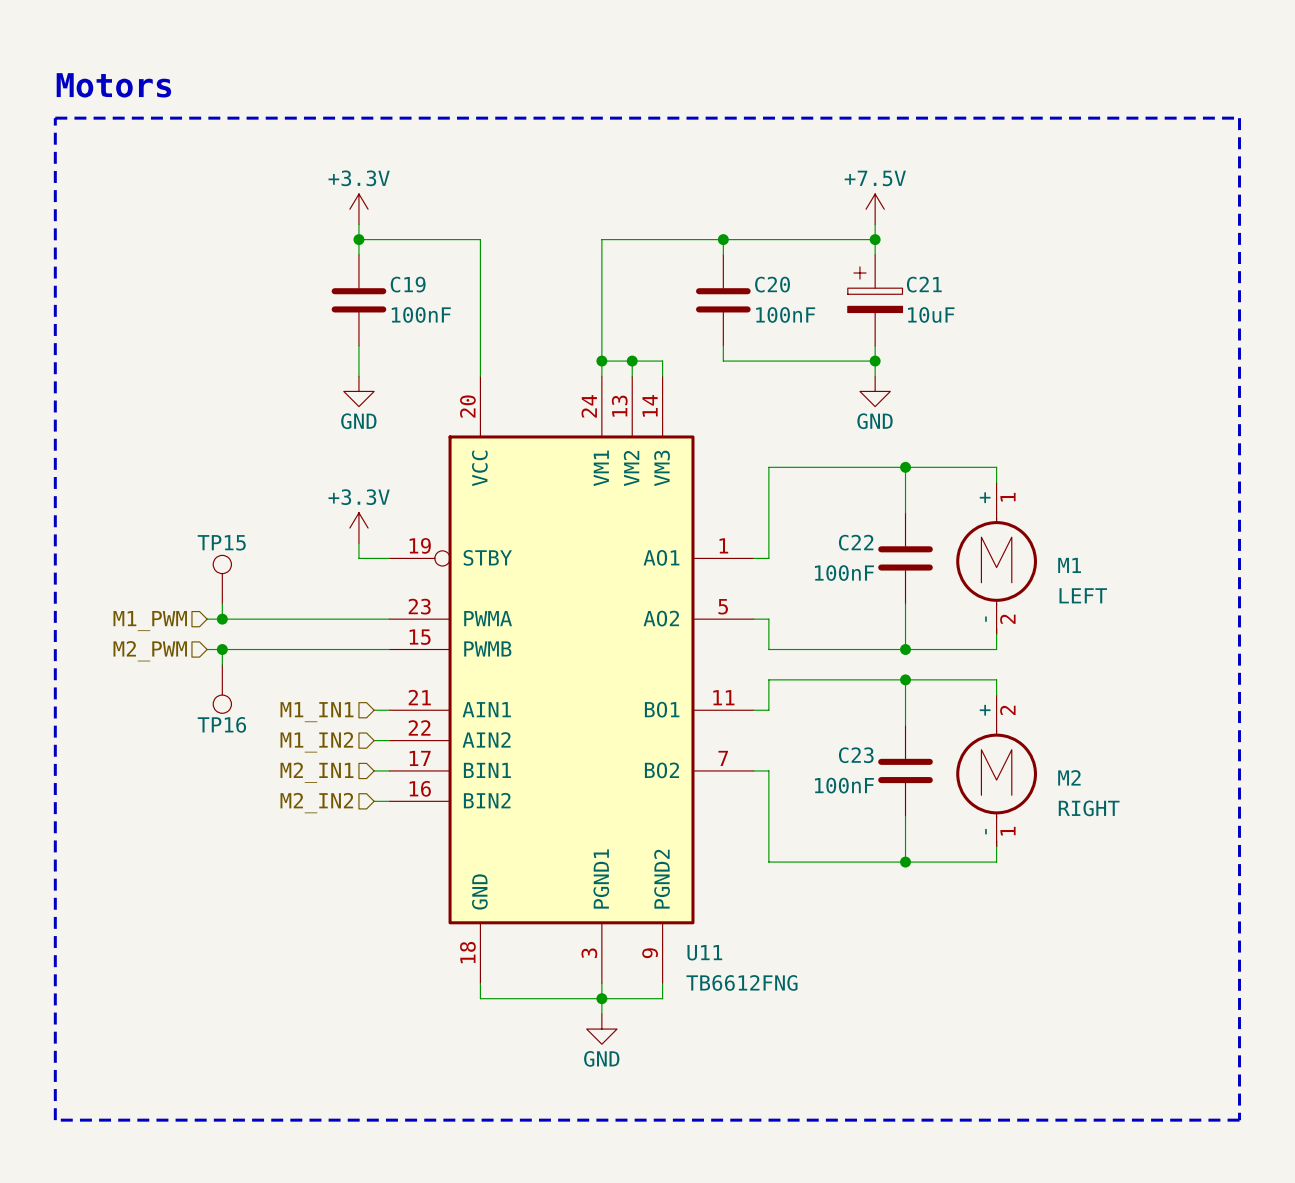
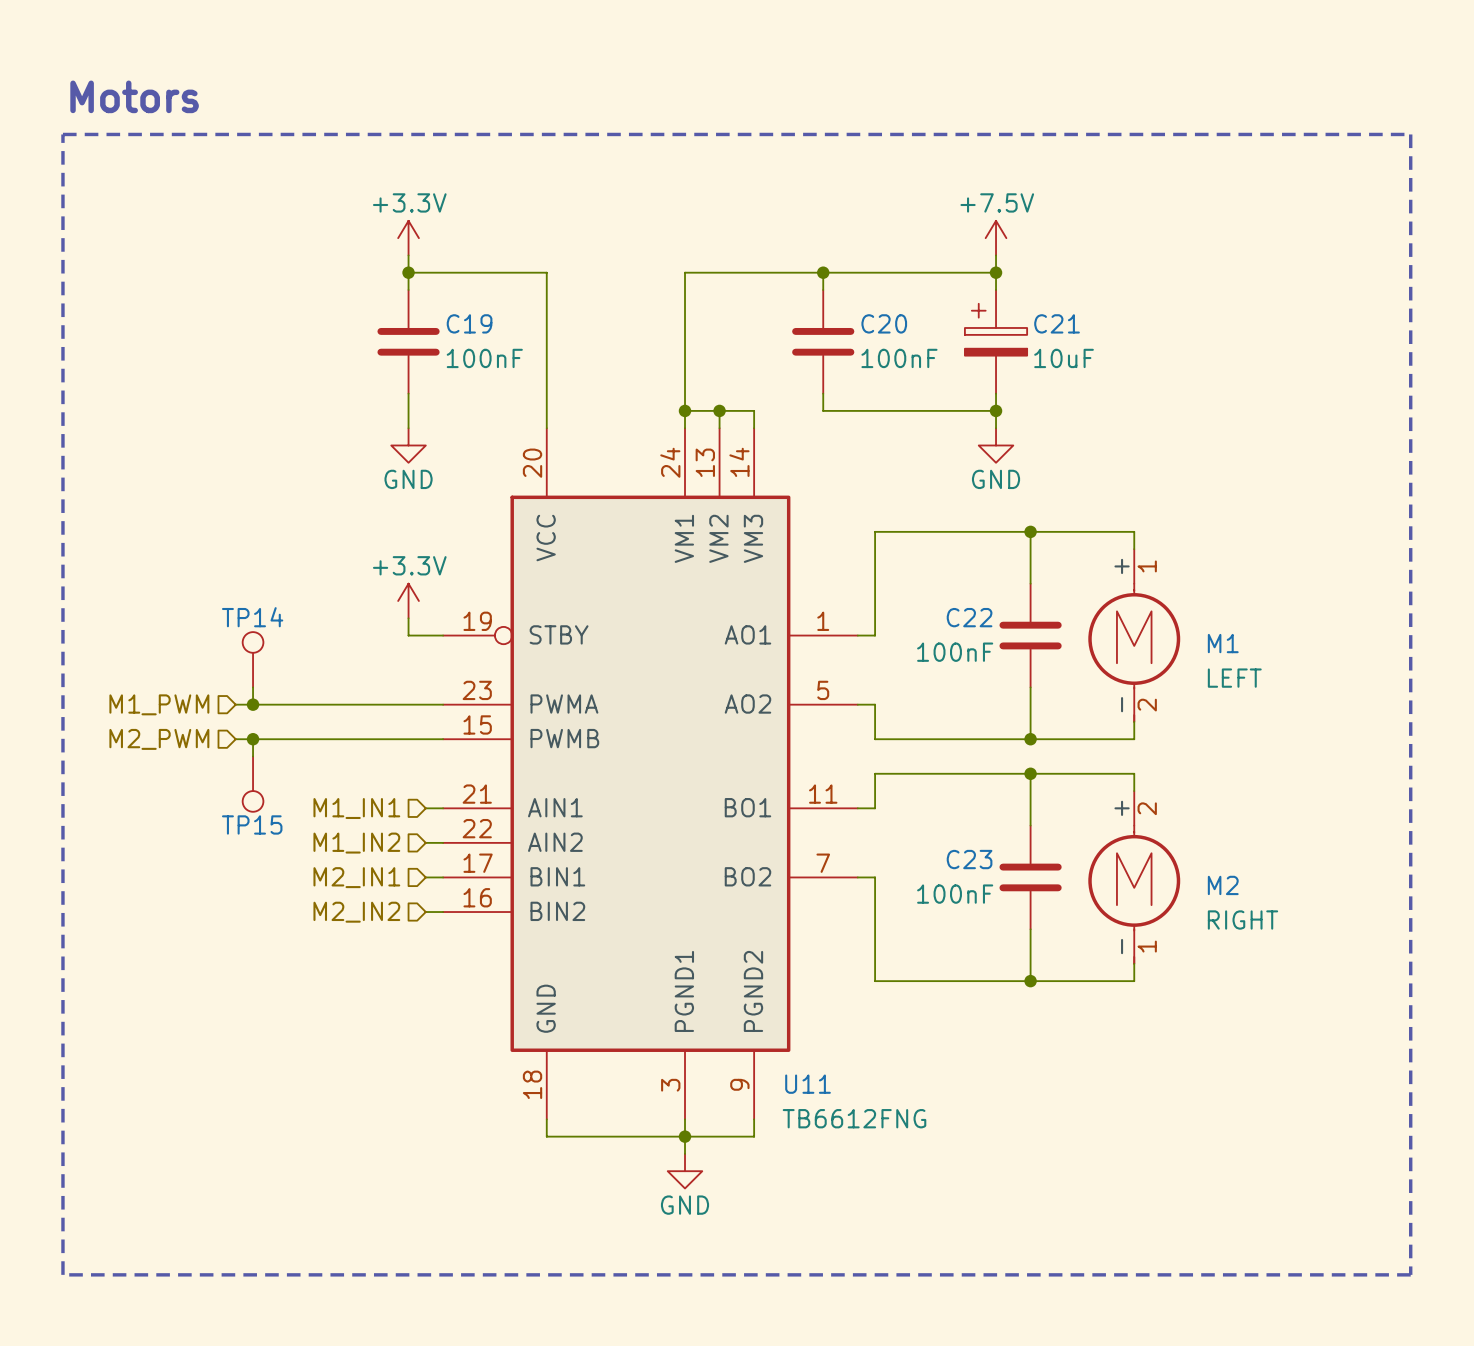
TP15 name: TP15 (221, 542) -> TP14 (252, 617)
TP16 name: TP16 (221, 724) -> TP15 (252, 824)

